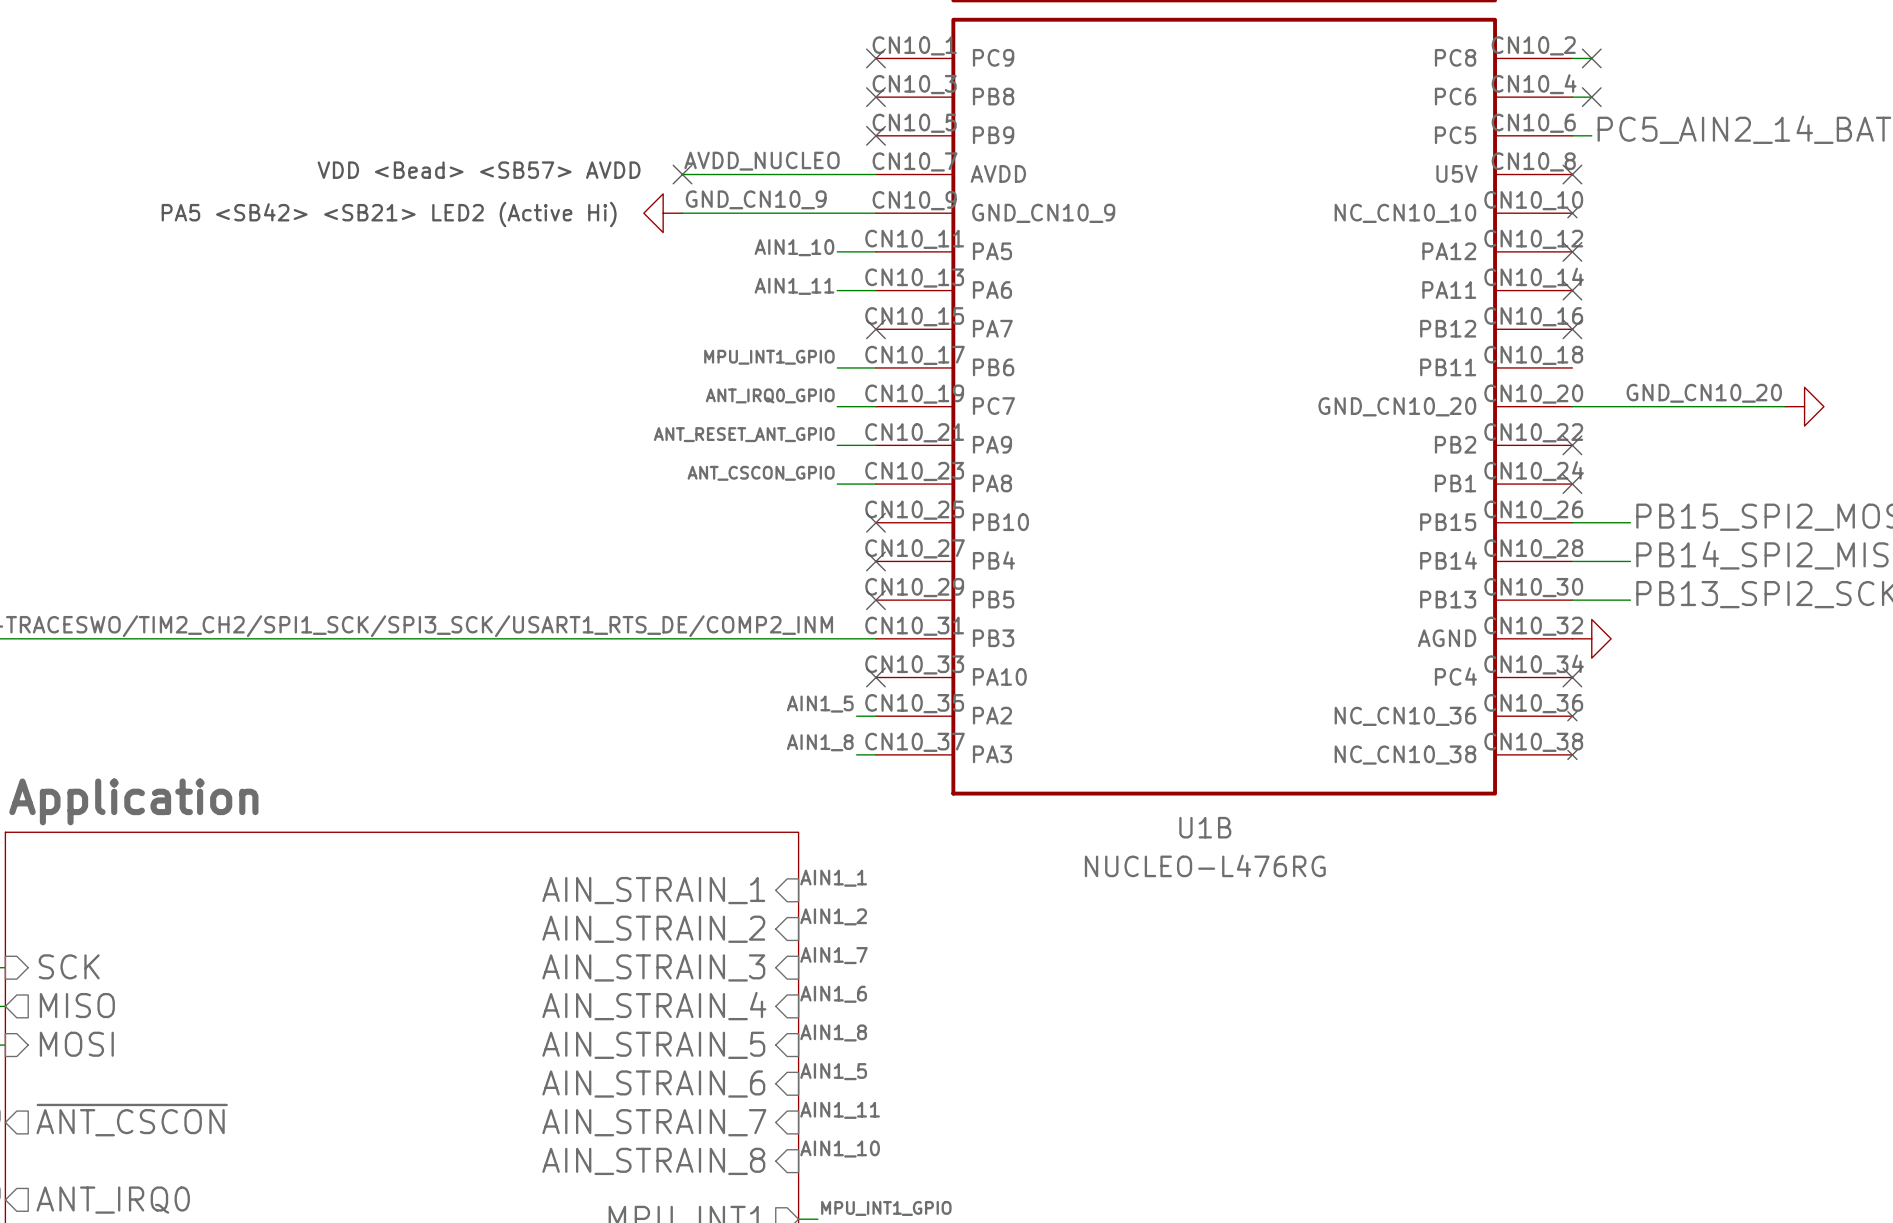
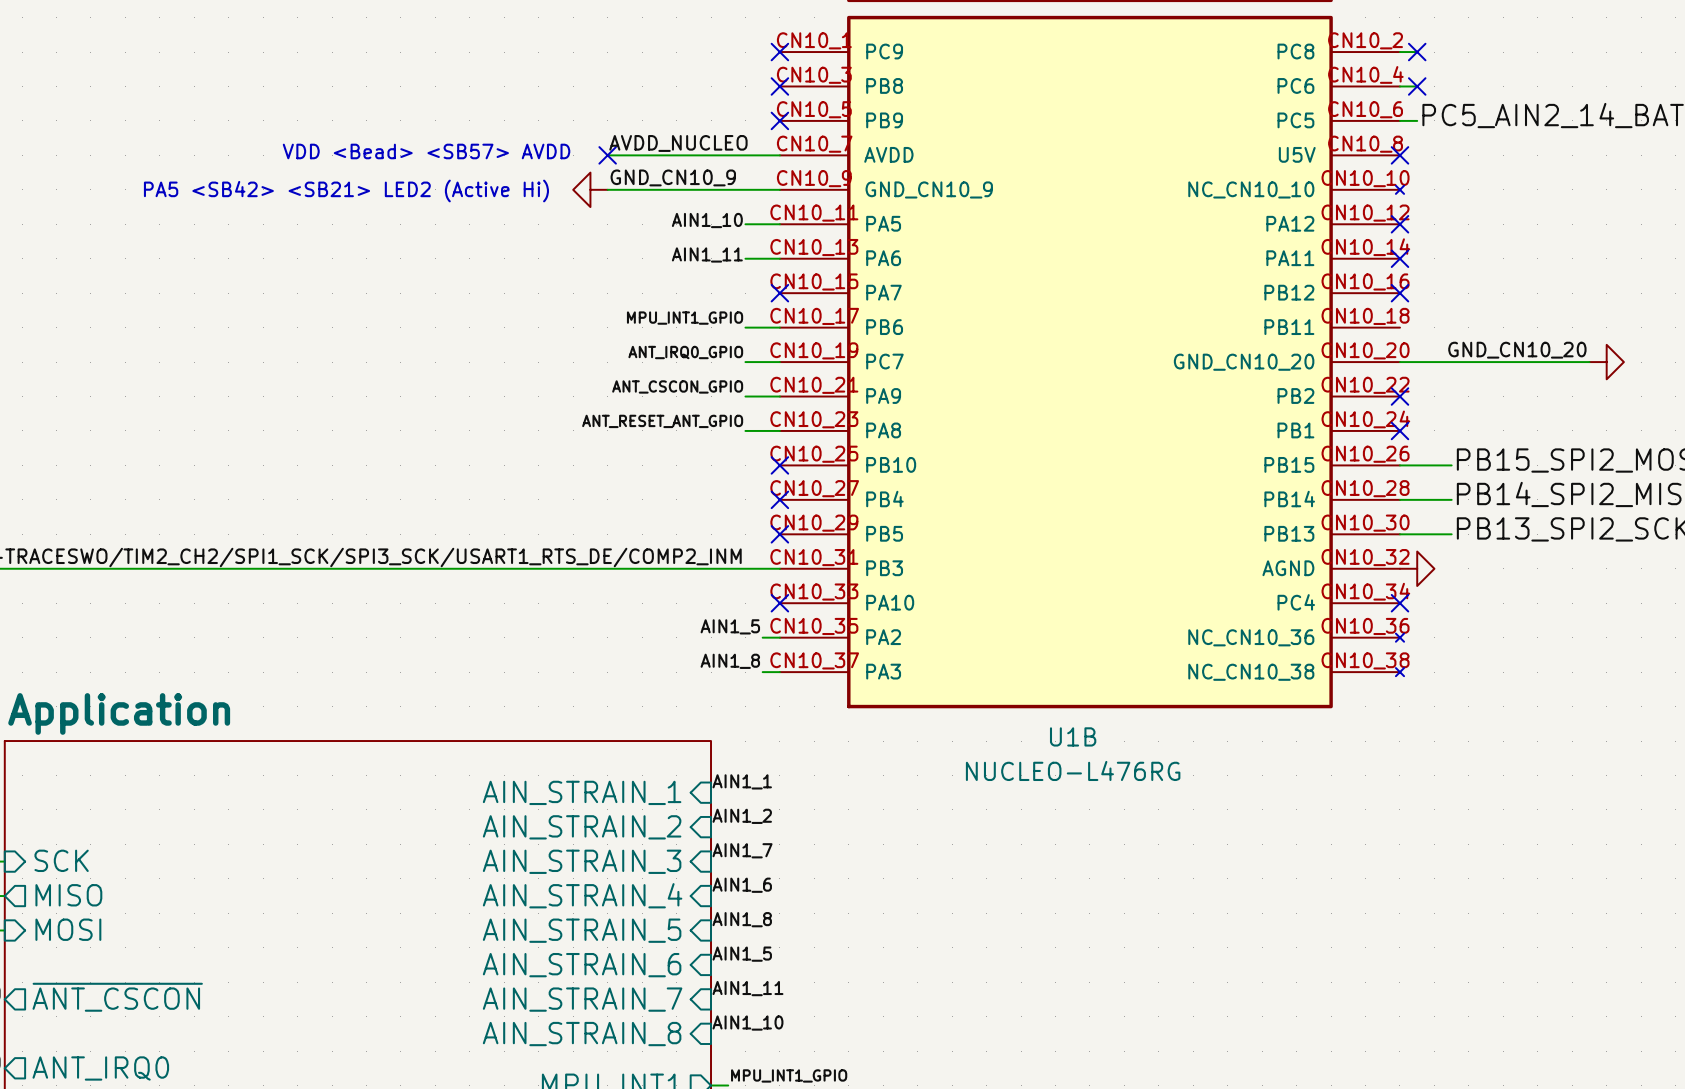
label: ANT_RESET_ANT_GPIO (744, 434) -> ANT_CSCON_GPIO (677, 386)
label: ANT_CSCON_GPIO (761, 473) -> ANT_RESET_ANT_GPIO (662, 421)

